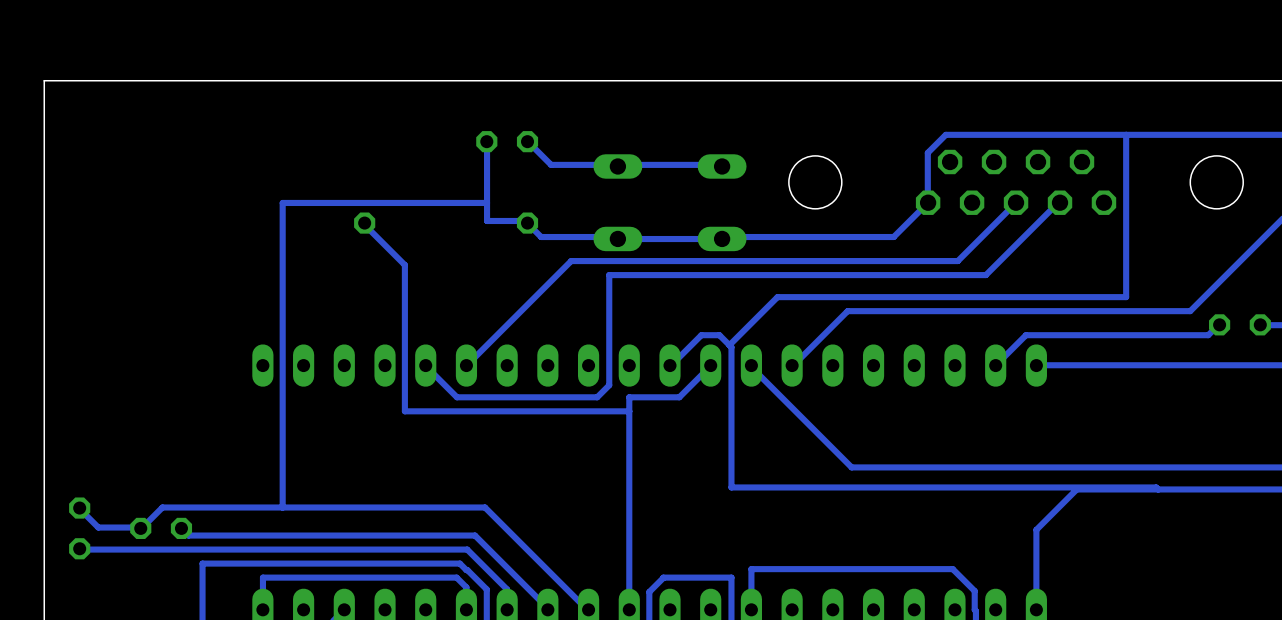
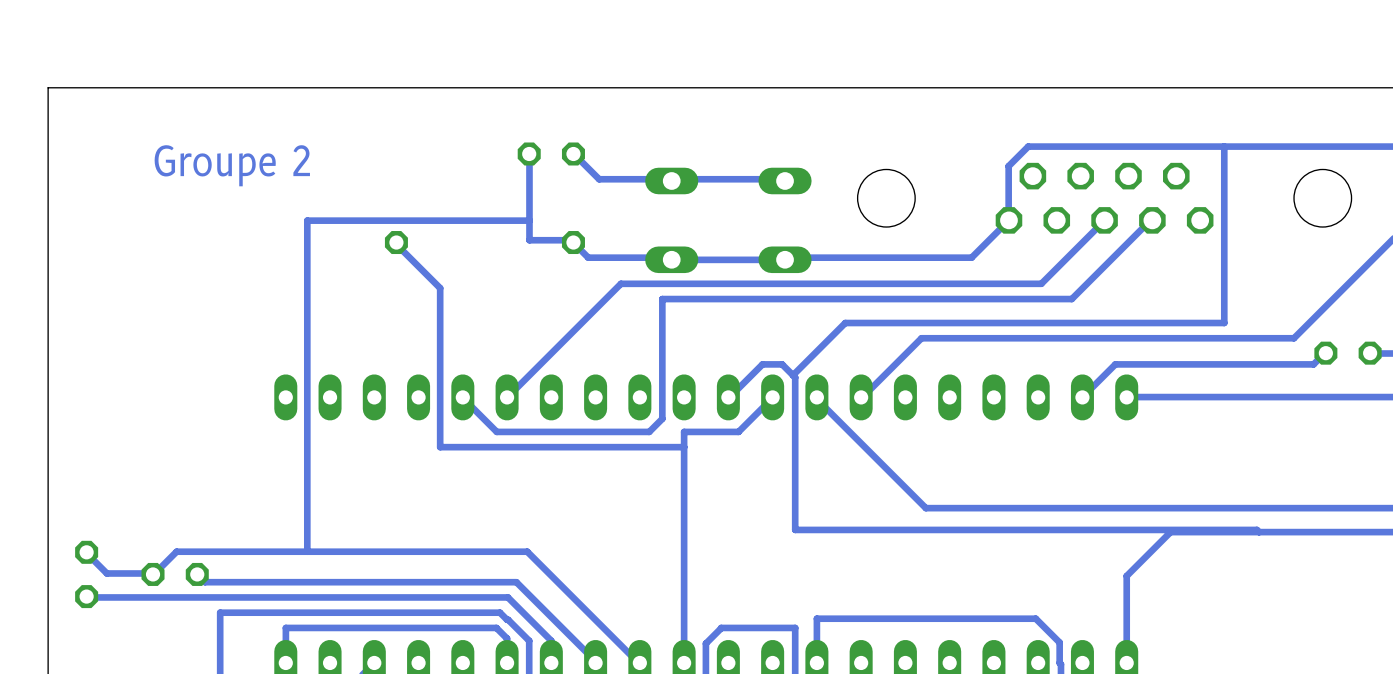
text: none -> Groupe 2 (232, 165)

